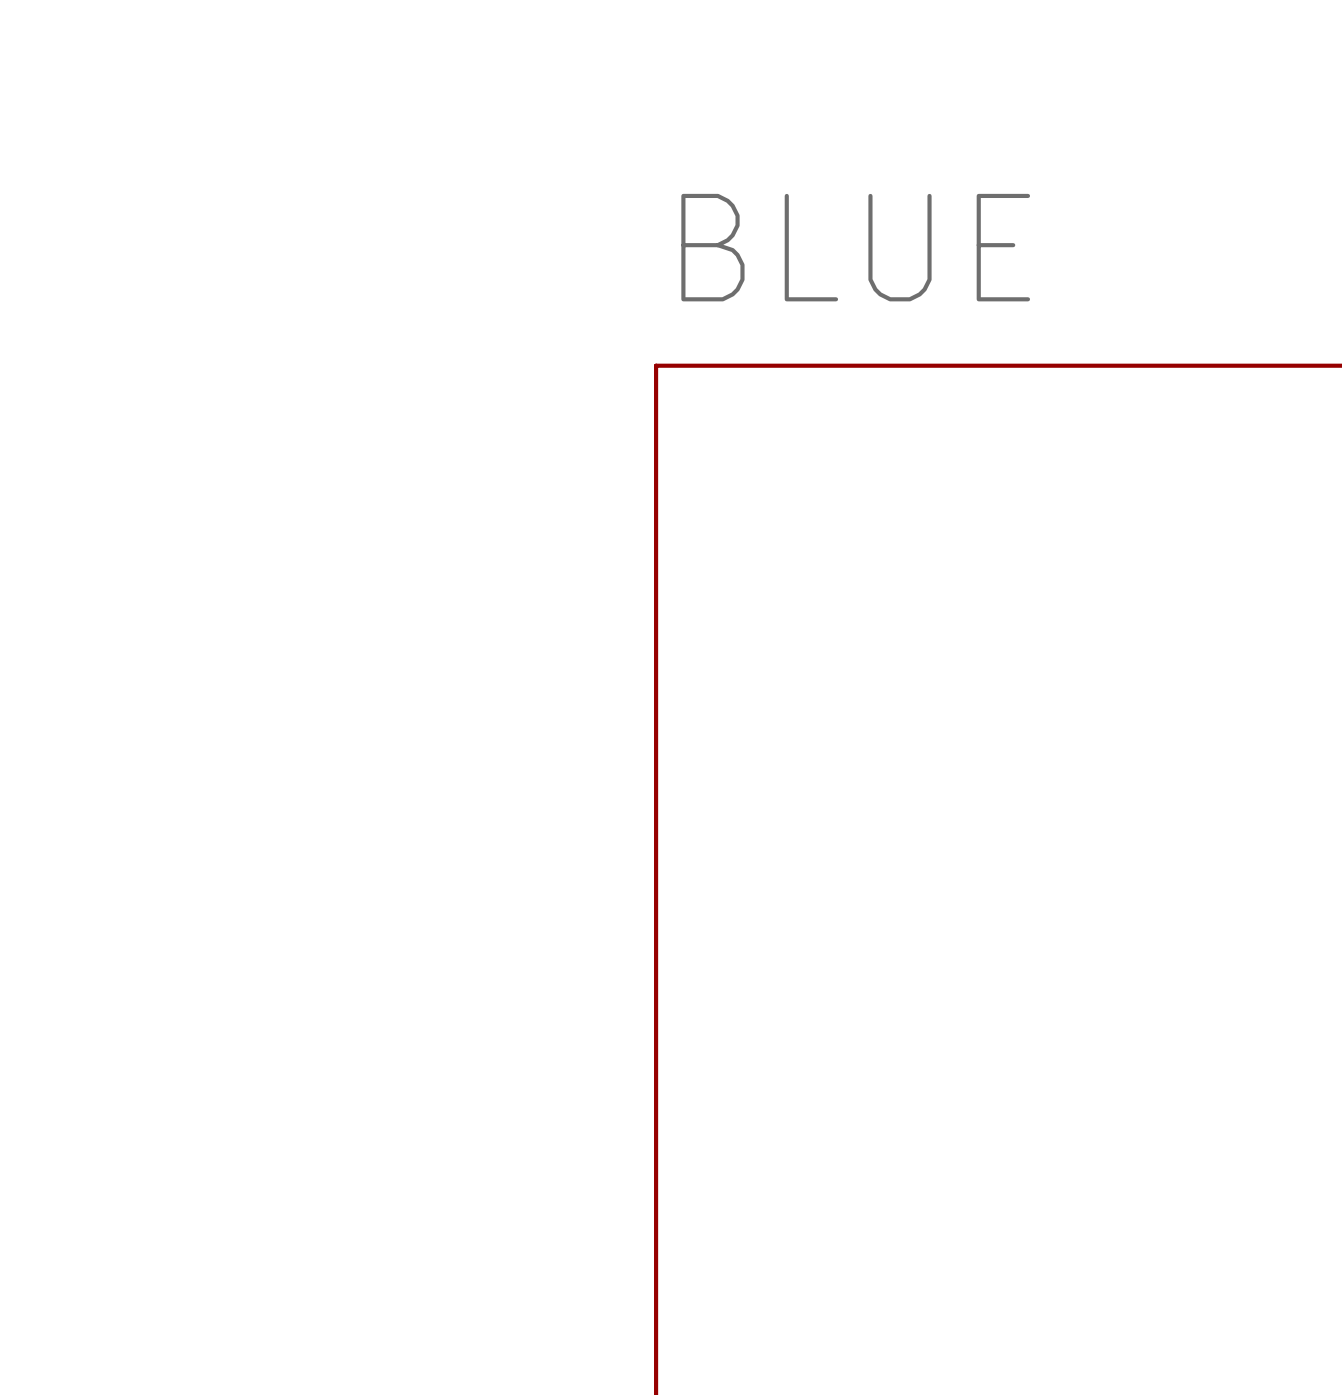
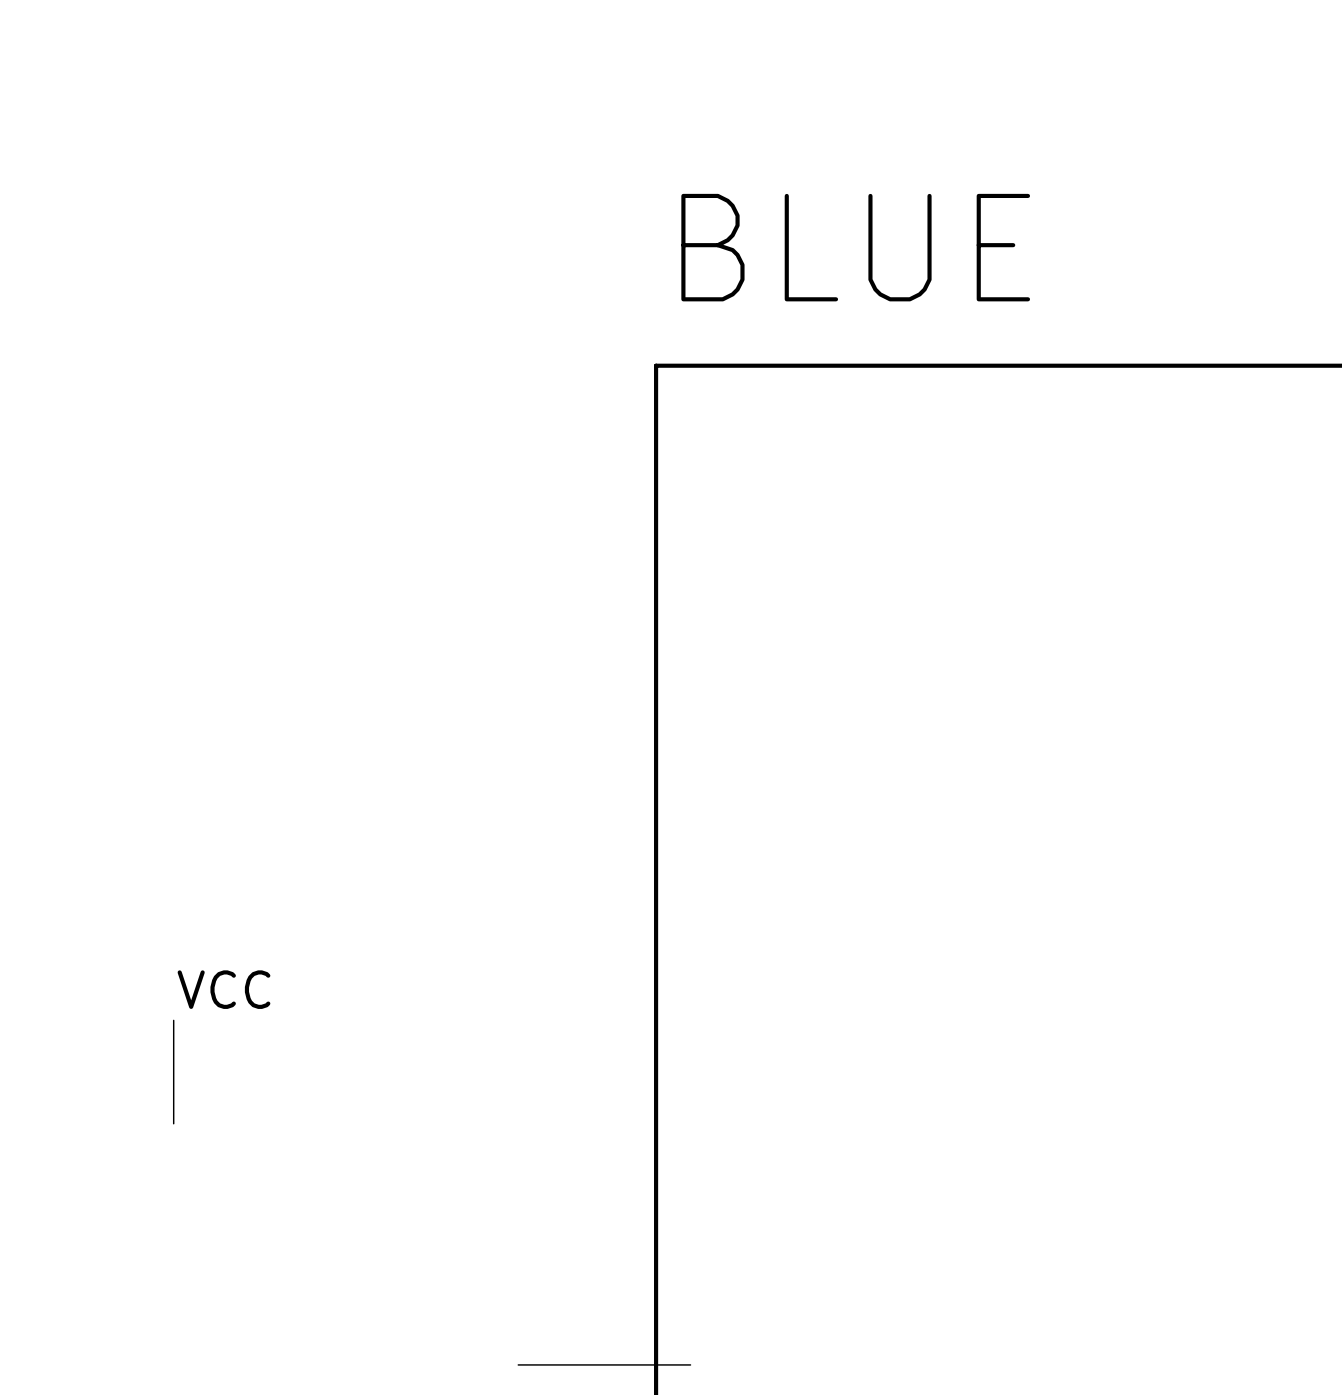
label: none -> VCC (223, 989)
wire: none -> (173, 1020) (173, 1123)
wire: none -> (518, 1364) (690, 1364)

